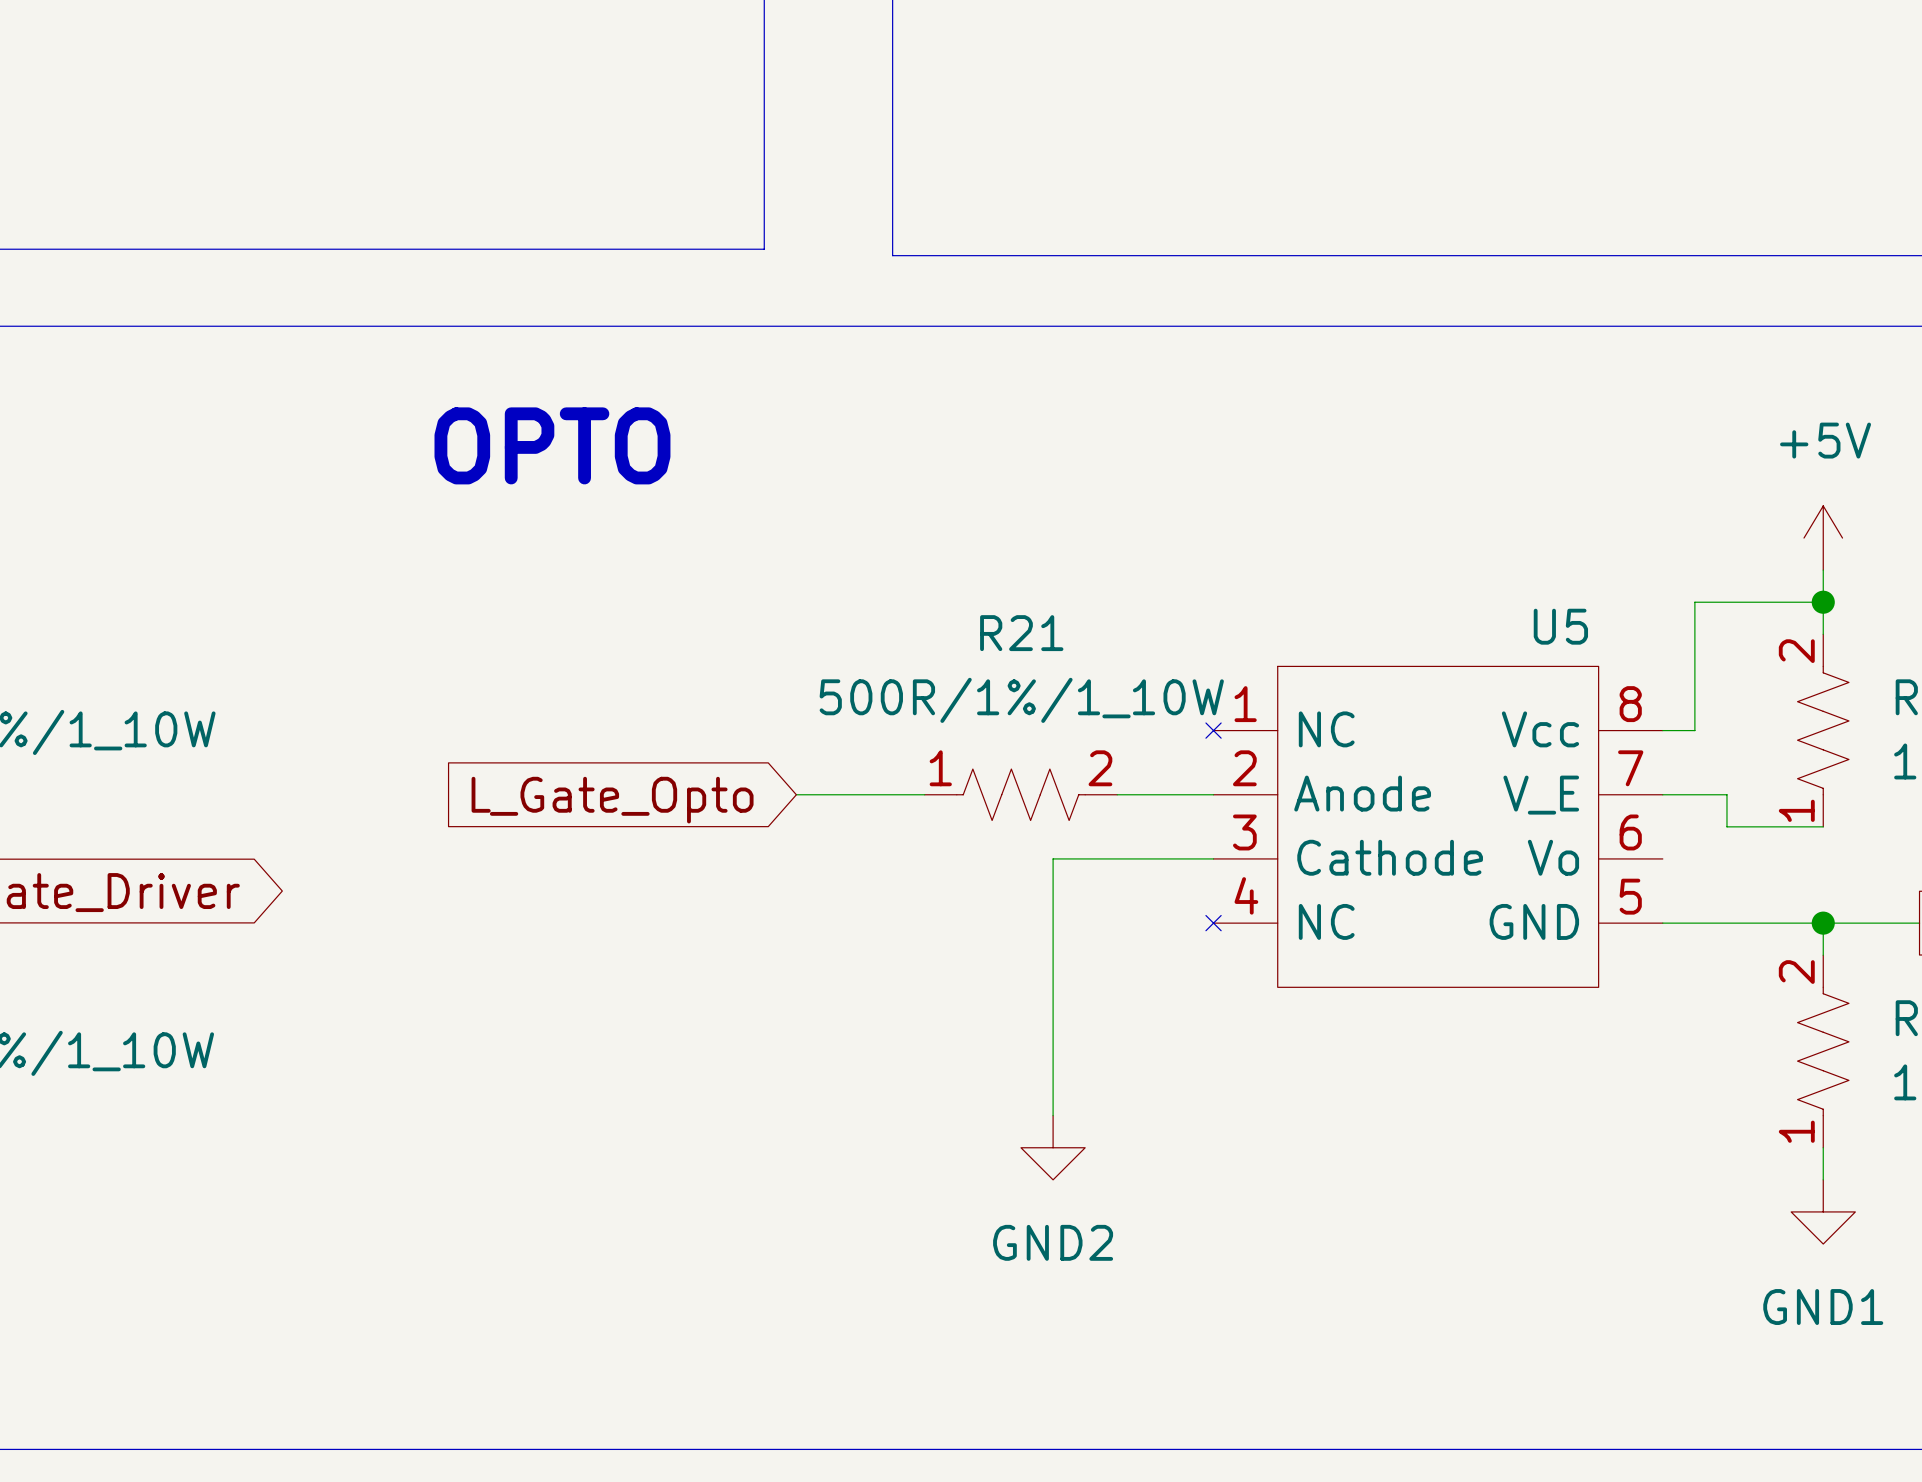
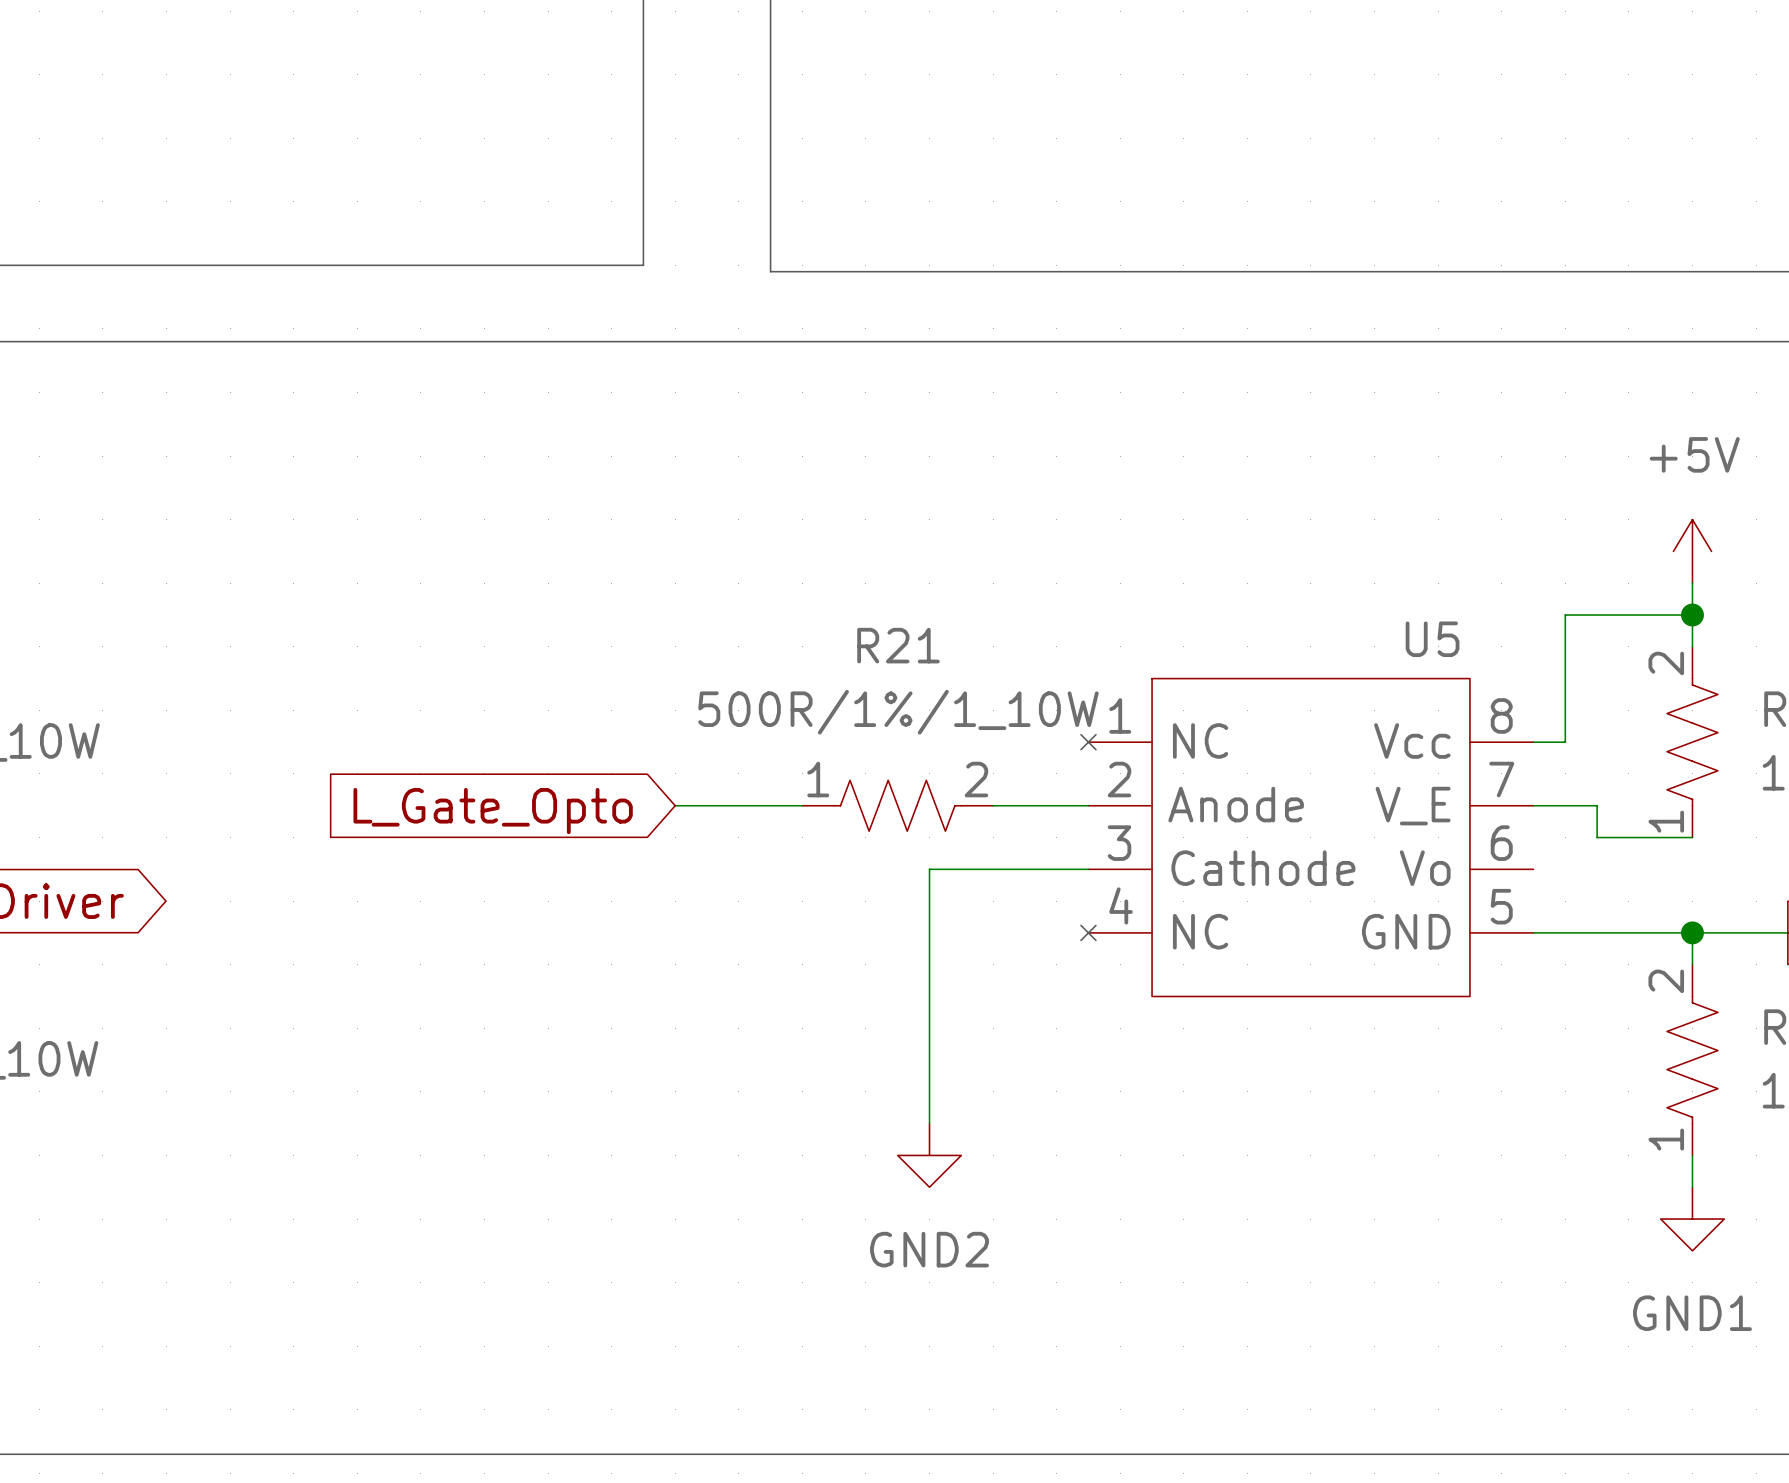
text: OPTO (552, 445) -> none

